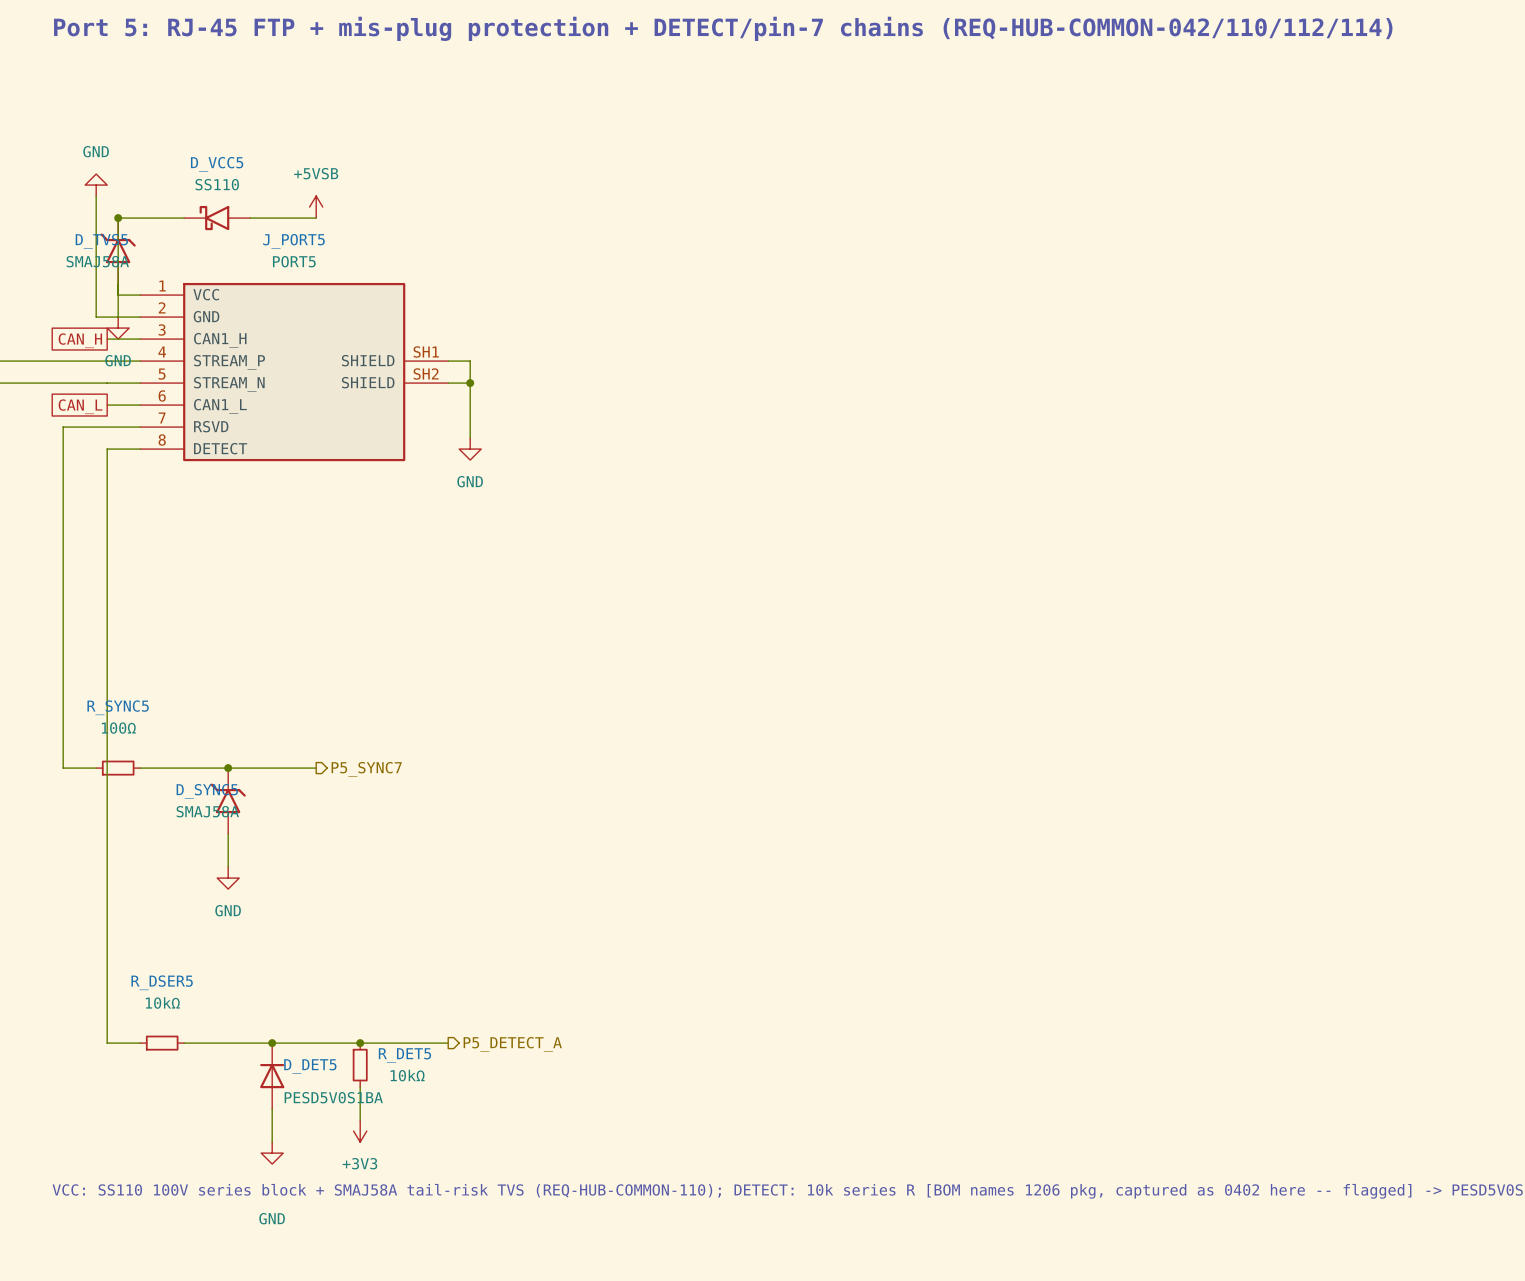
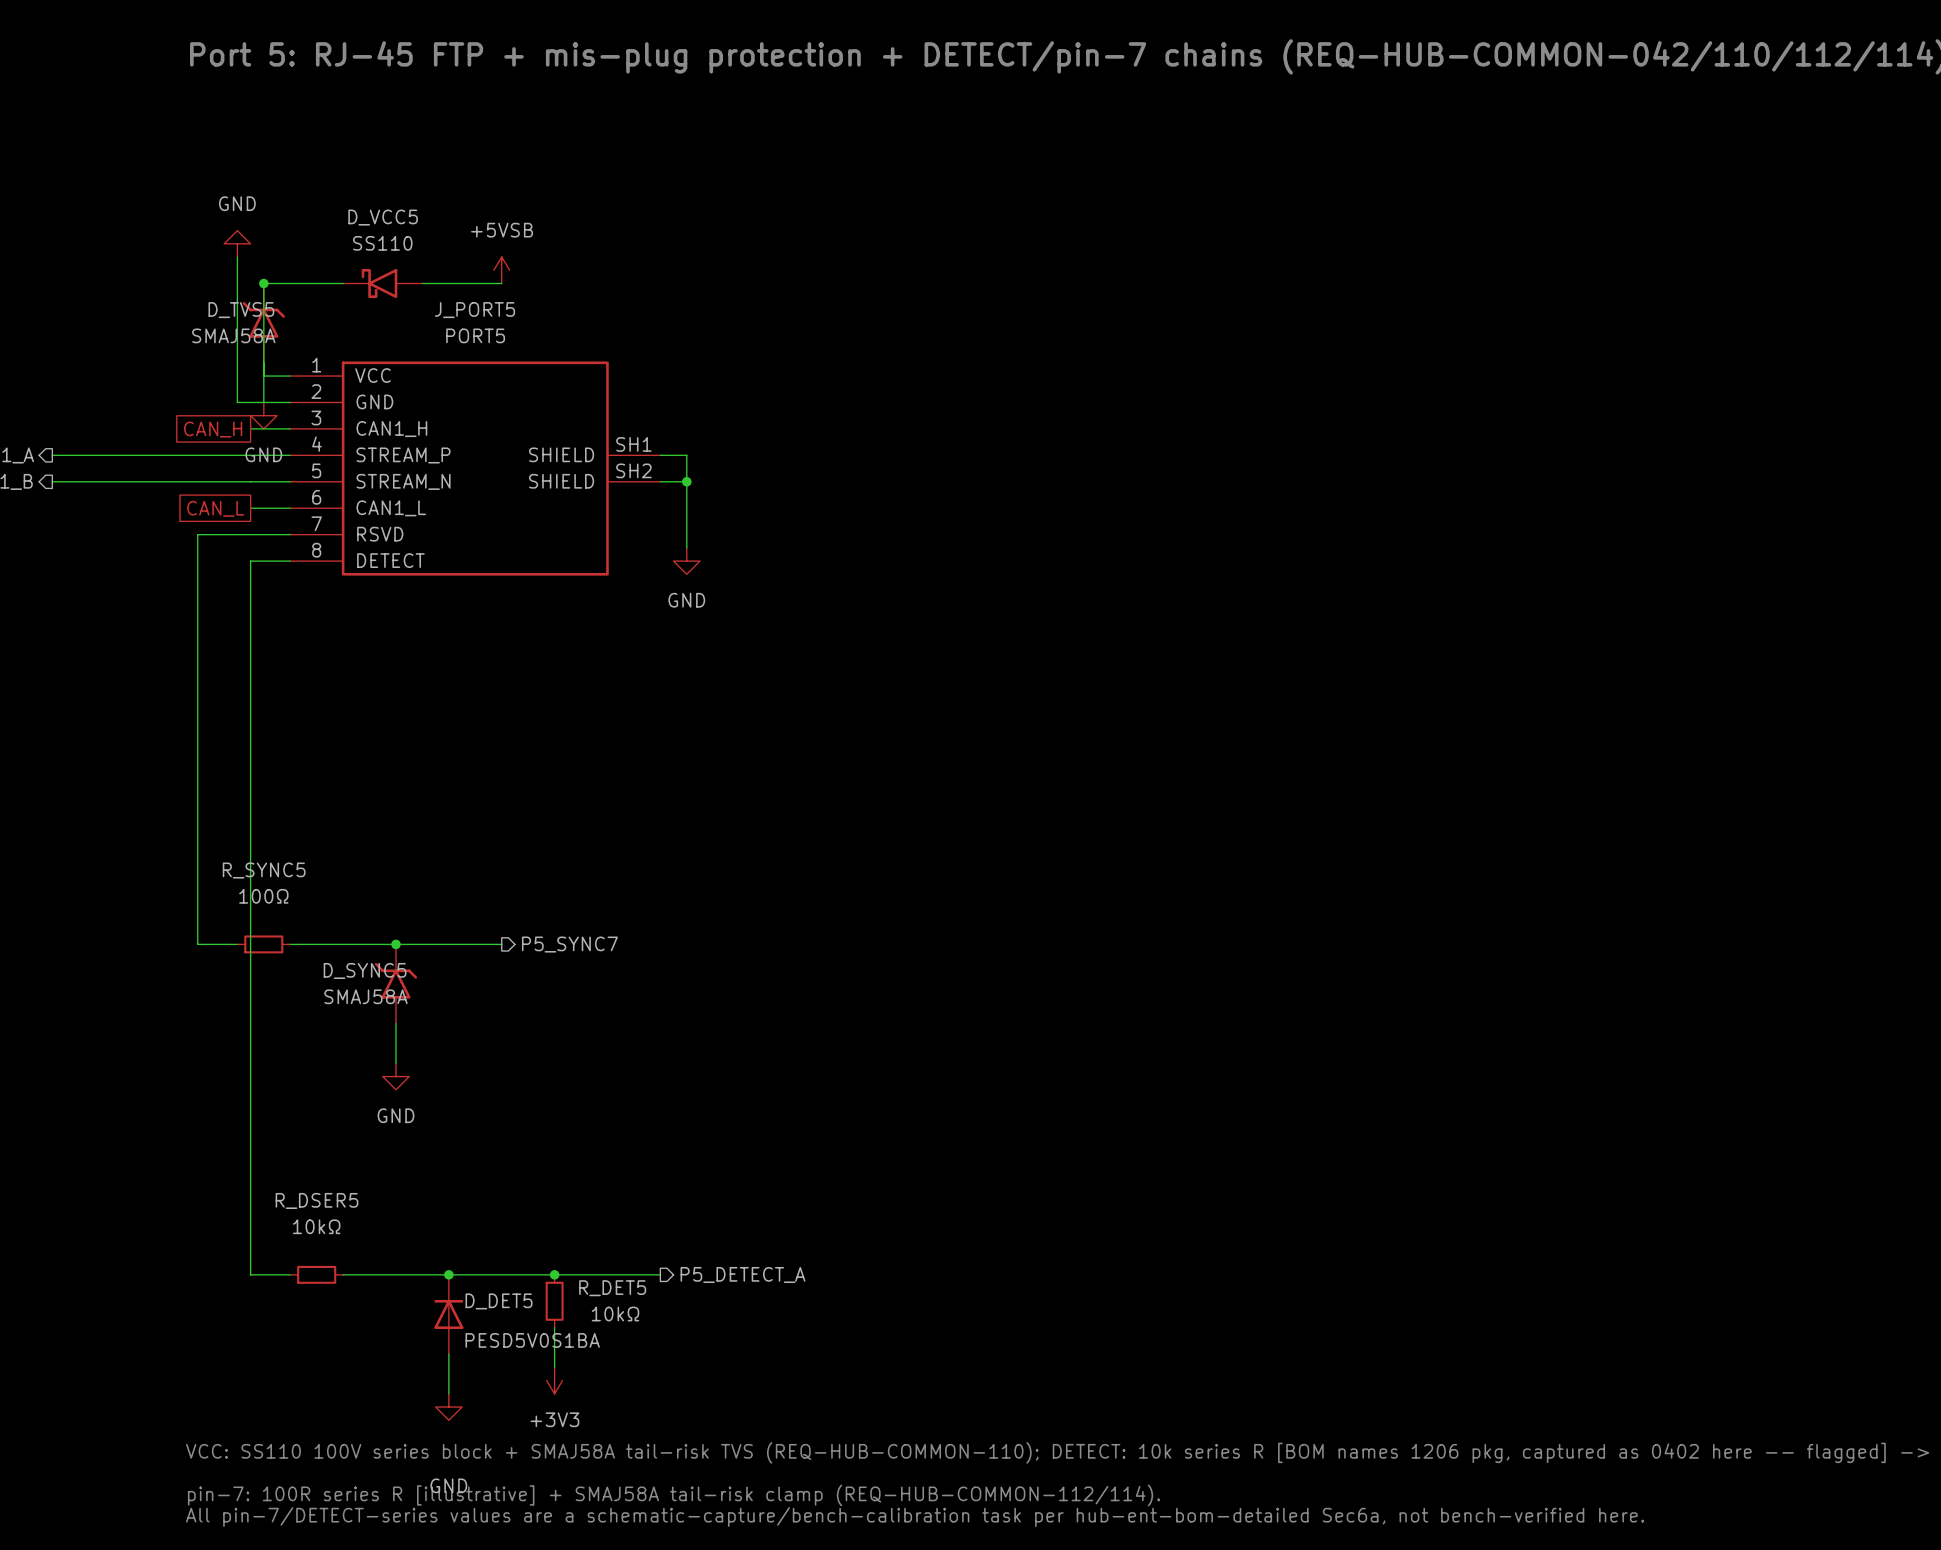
text: none -> pin-7: 100R series R [illustrative] + SMAJ58A tail-risk clamp (REQ-HUB-COMMON-112/114). (673, 1495)
text: none -> All pin-7/DETECT-series values are a schematic-capture/bench-calibration task per hub-ent-bom-detailed Sec6a, not bench-verified here. (915, 1517)

